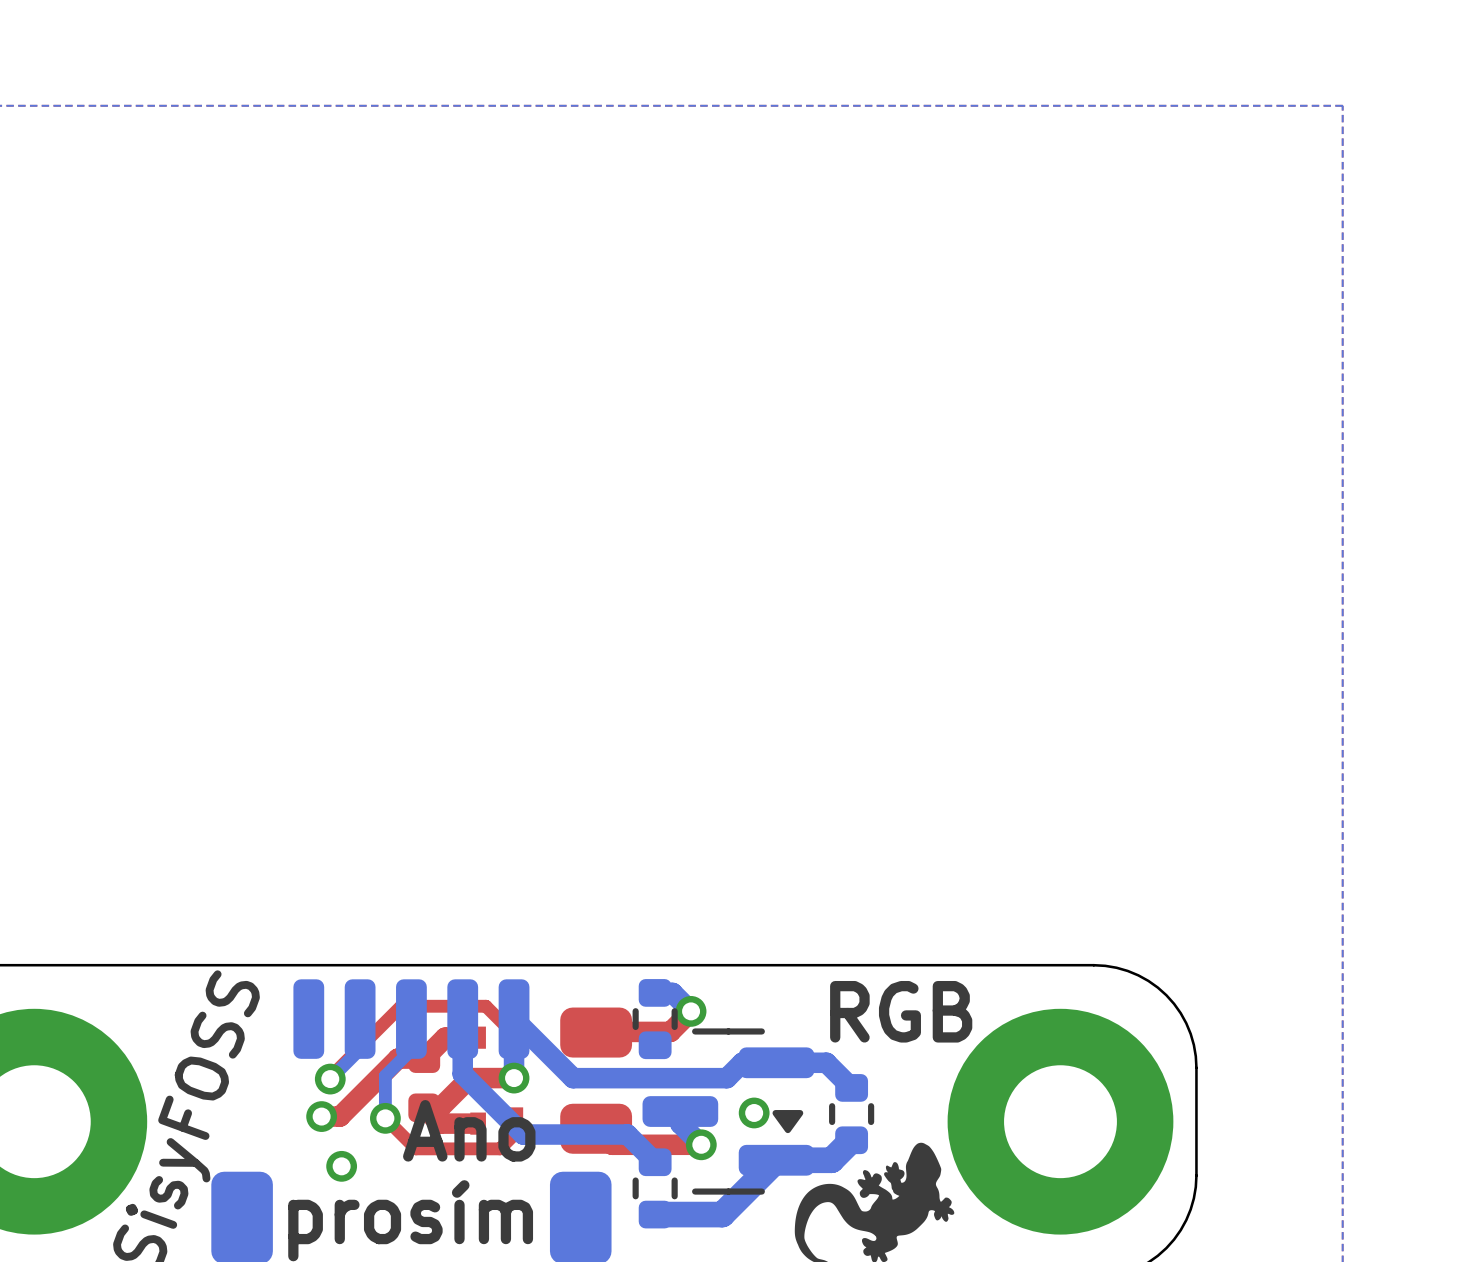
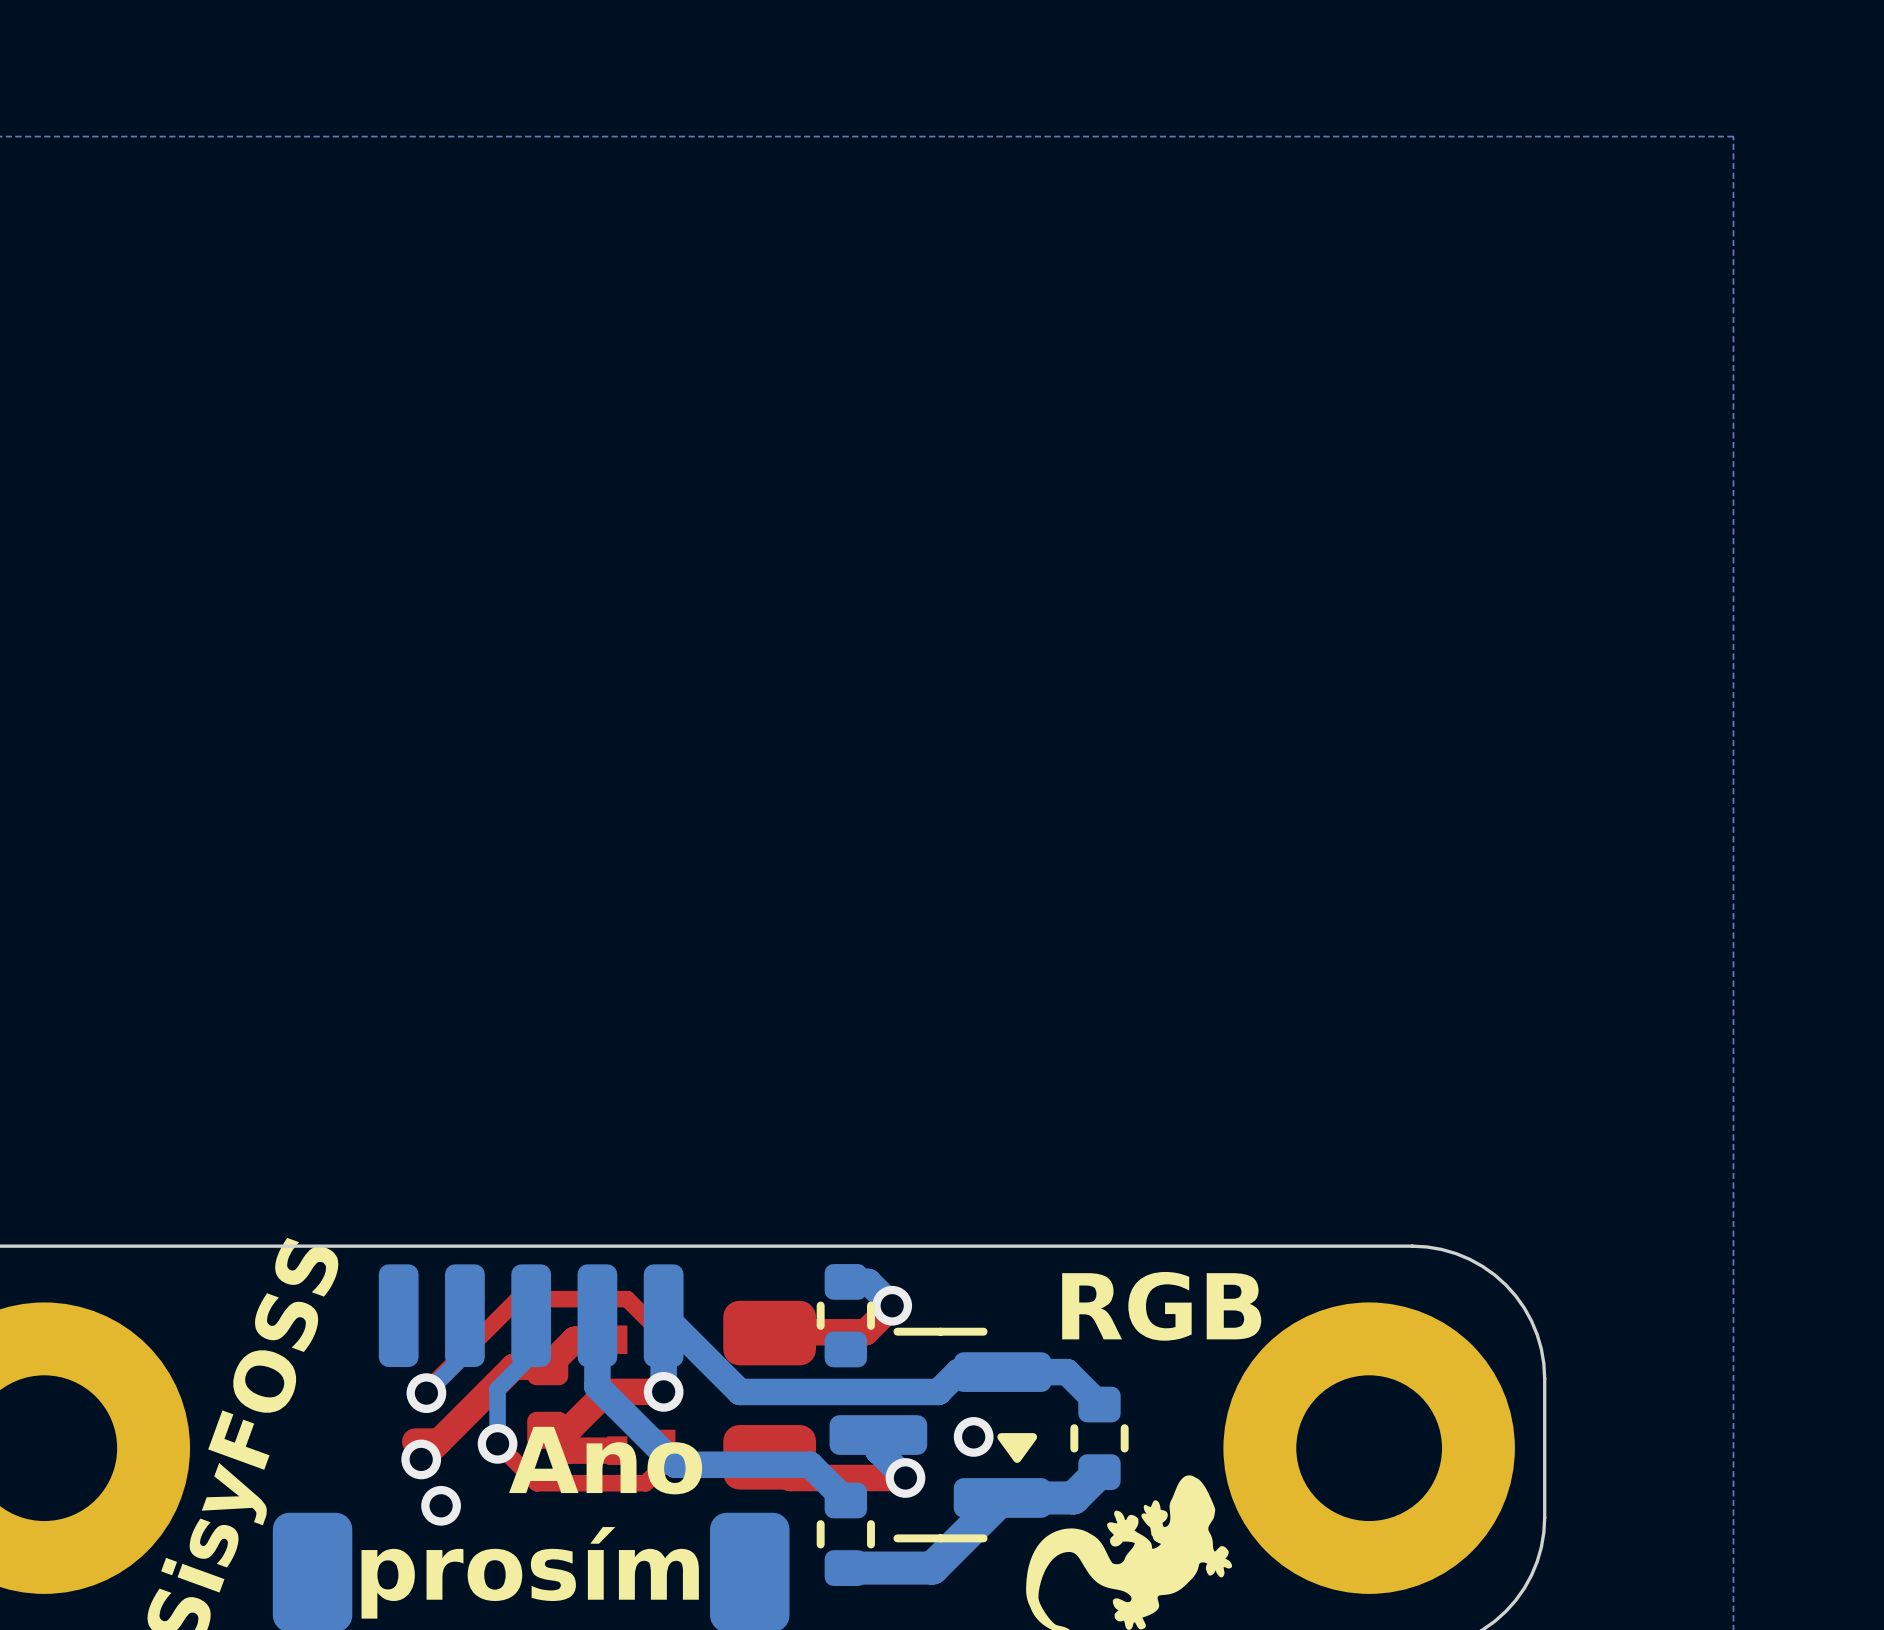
top track: (398, 1058) (340, 1116) -> (513, 1366) (421, 1459)
via position: (321, 1116) -> (421, 1459)

